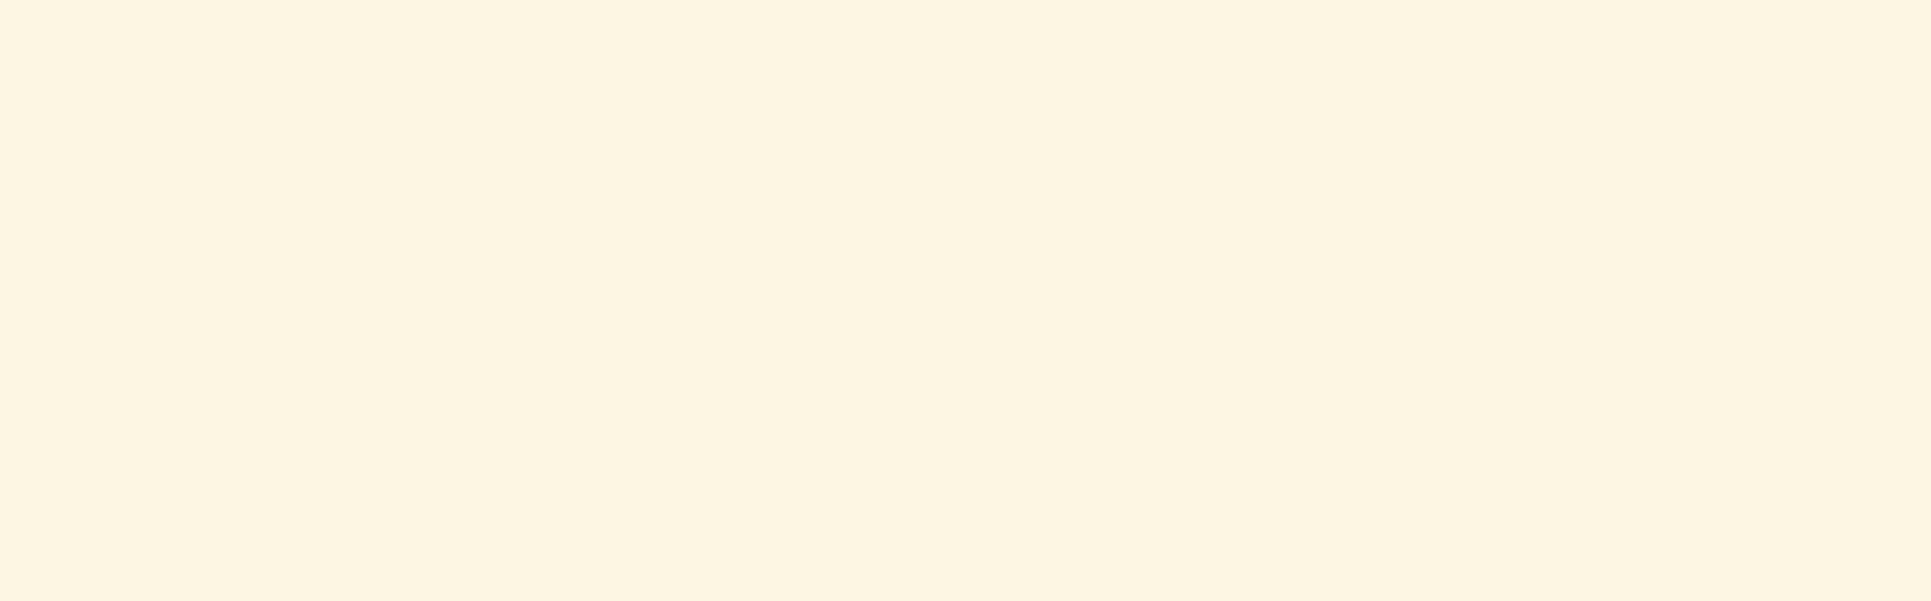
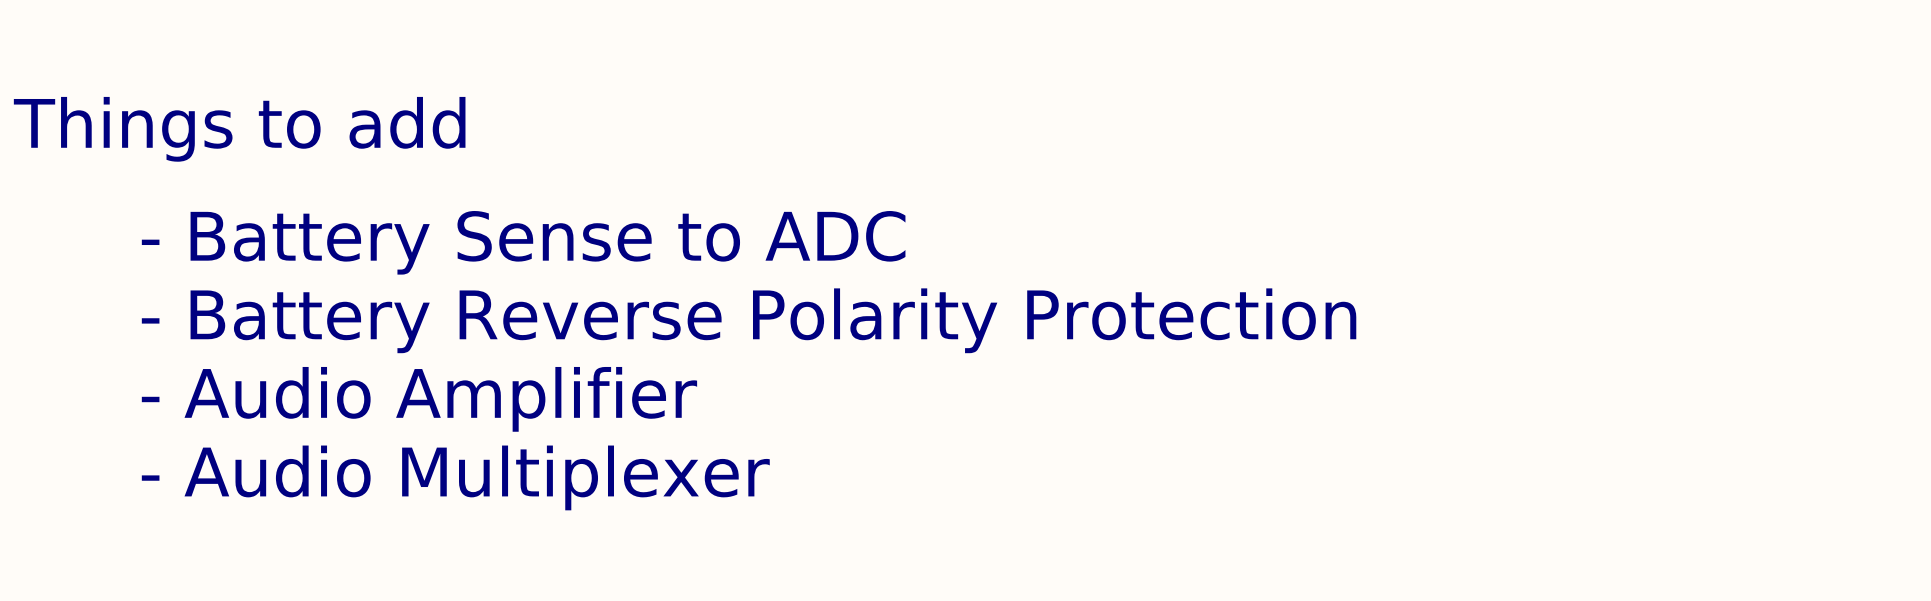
text: none -> Things to add (239, 129)
text: none -> - Battery Sense to ADC (523, 242)
text: none -> - Battery Reverse Polarity Protection (749, 320)
text: none -> - Audio Amplifier (419, 399)
text: none -> - Audio Multiplexer (455, 477)

